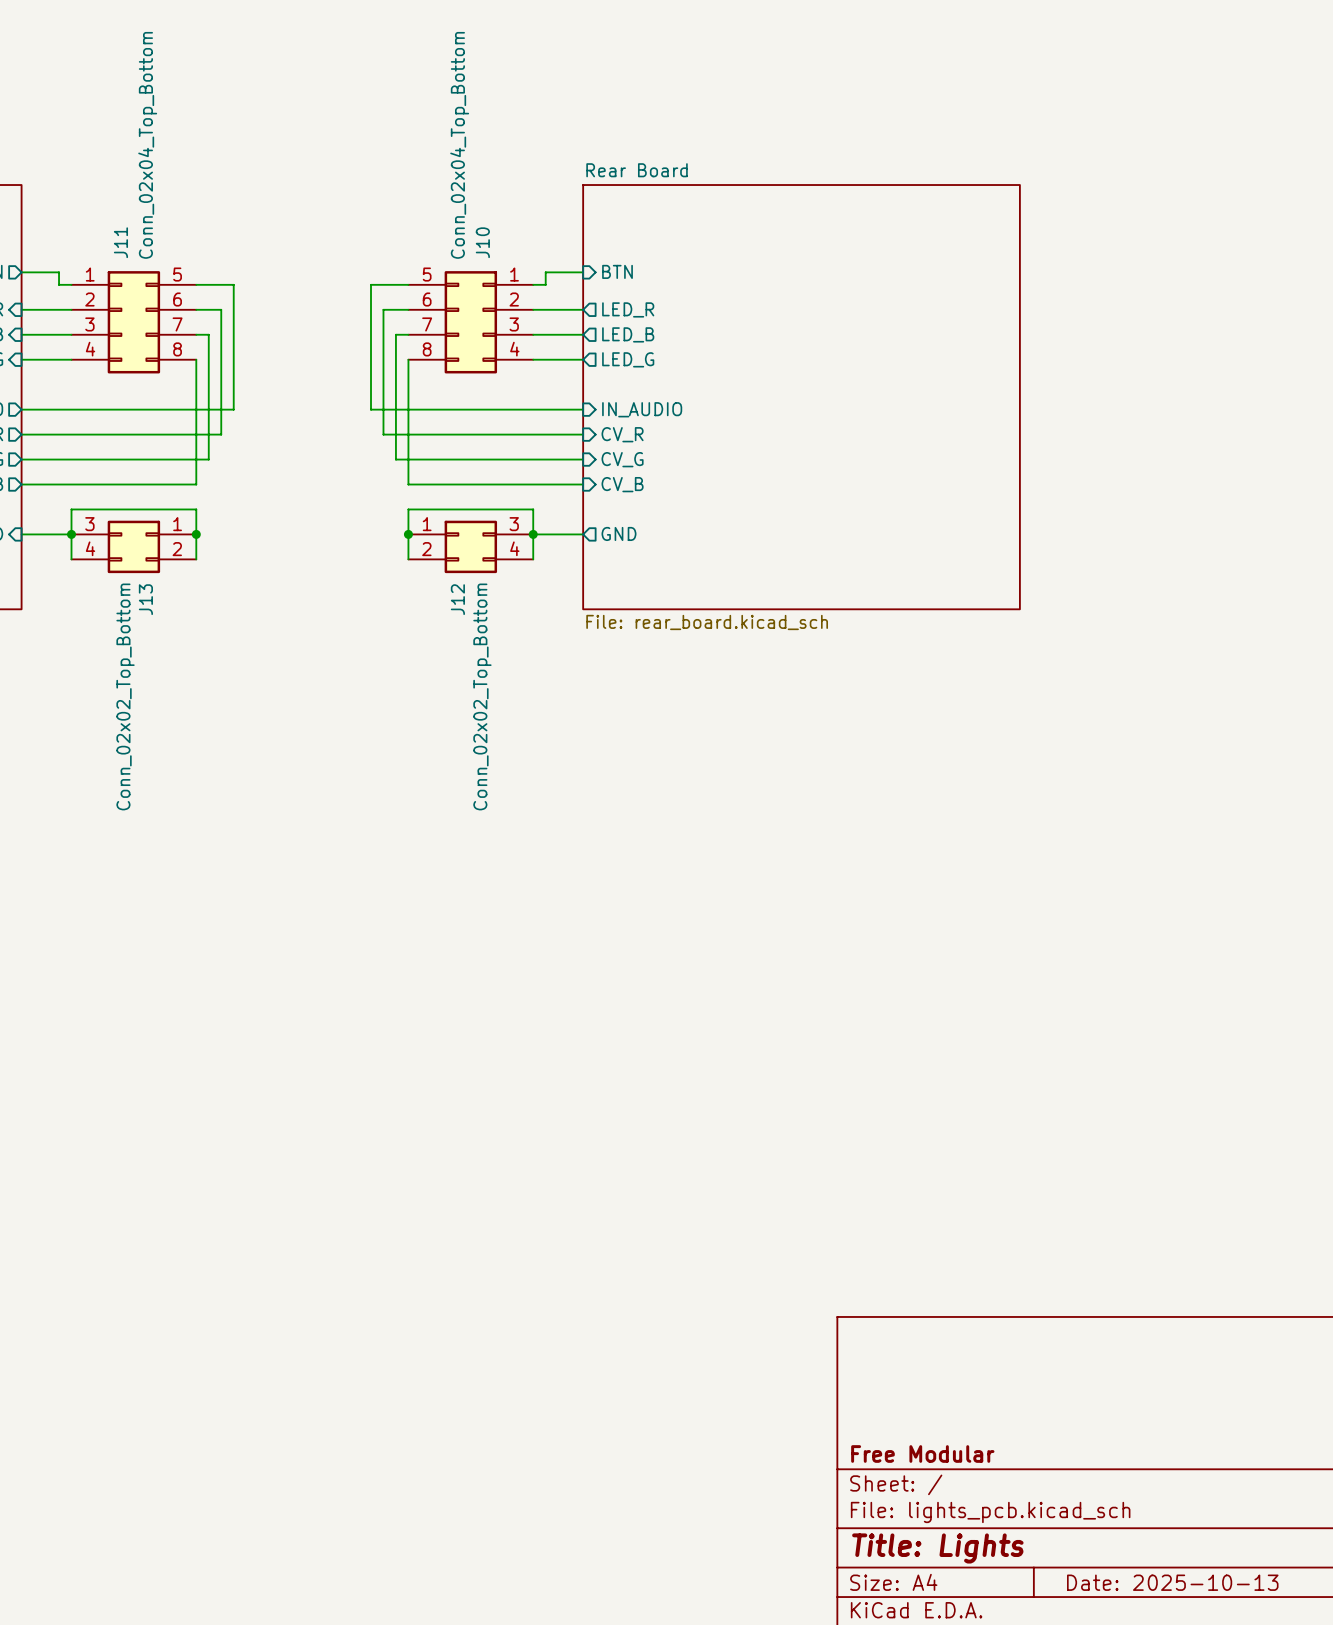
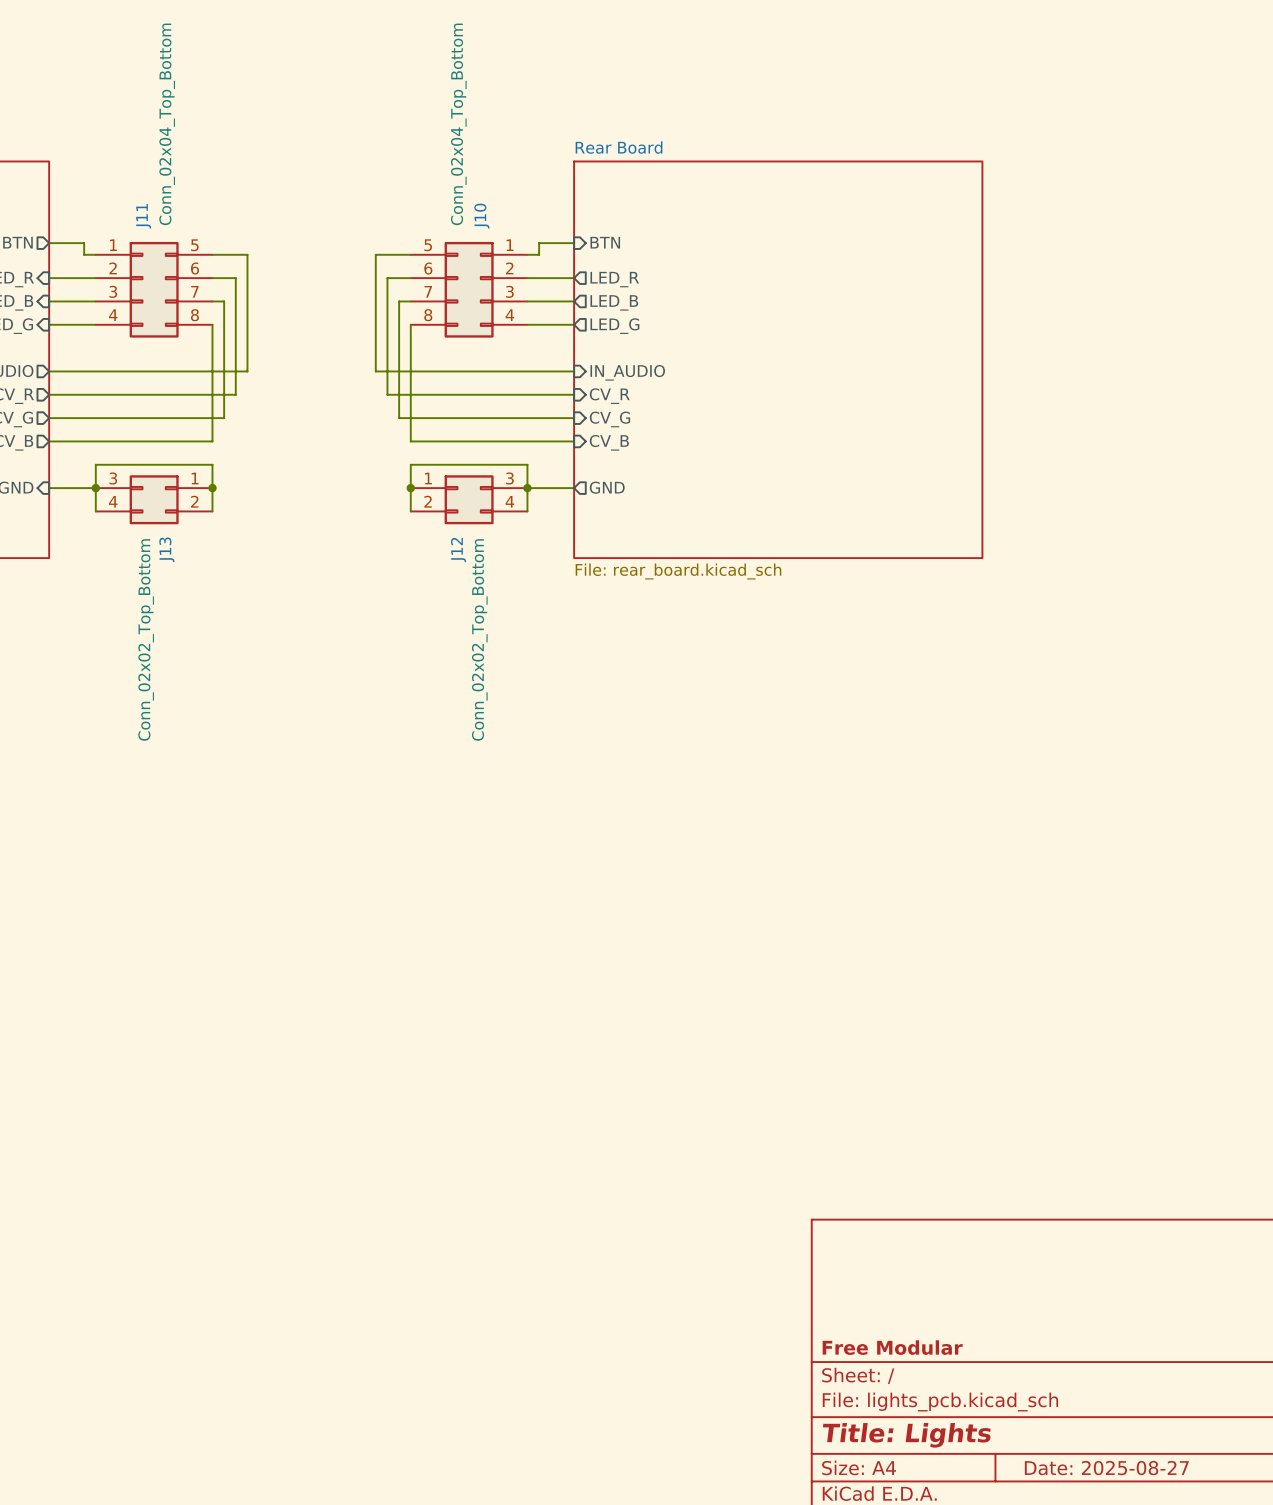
title block: Date: 2025-10-13 (1172, 1582) -> Date: 2025-08-27 (1106, 1468)

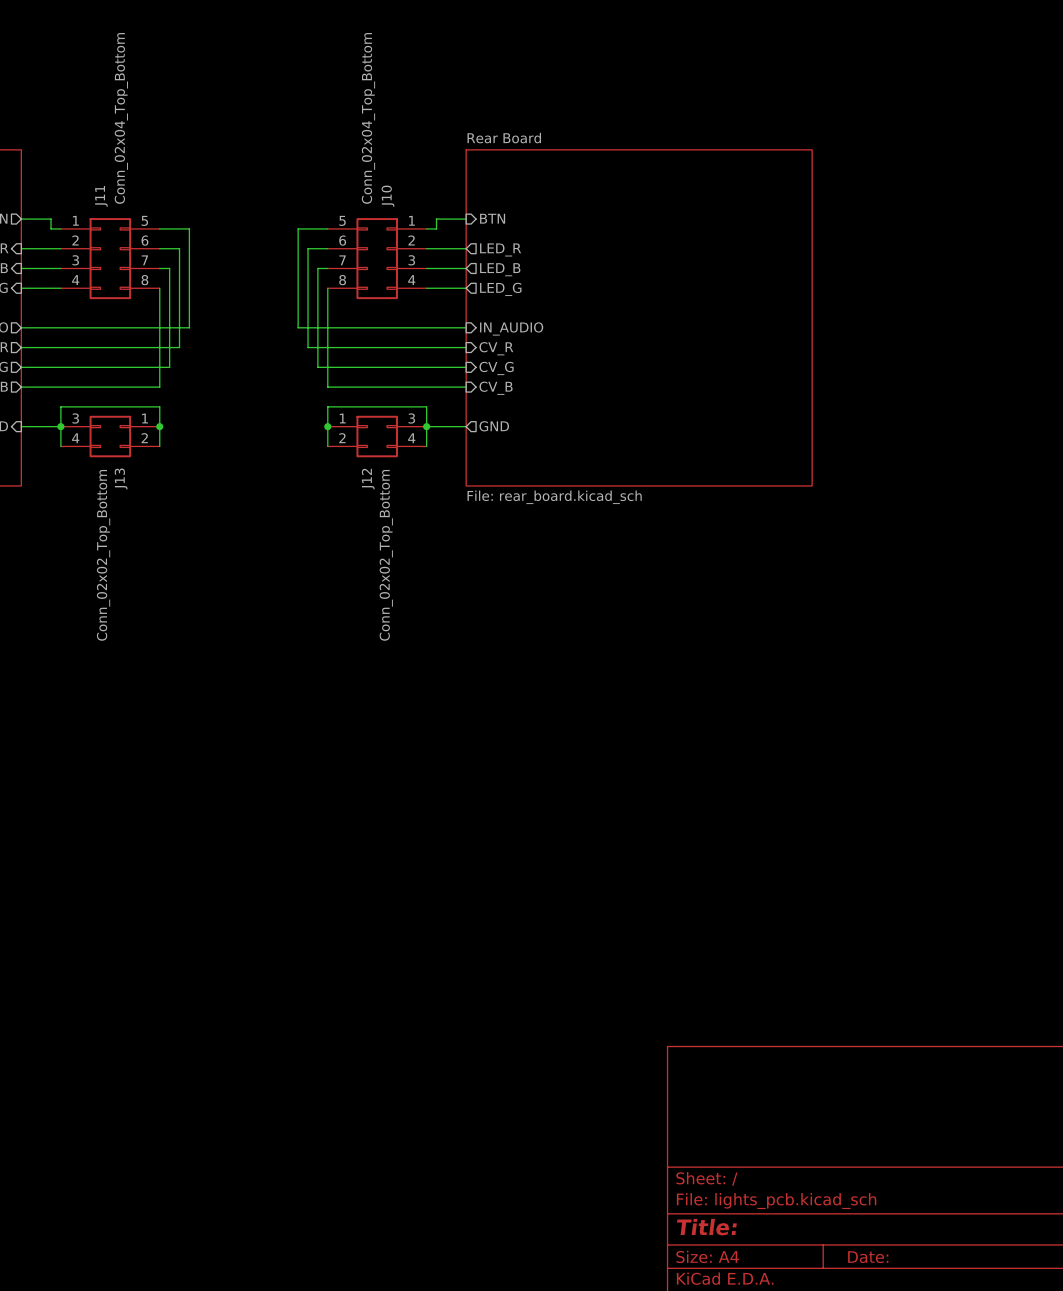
title block: Free Modular (892, 1347) -> none
title block: Title: Lights (906, 1435) -> Title: (706, 1227)
title block: Date: 2025-08-27 (1106, 1468) -> Date: (868, 1257)

